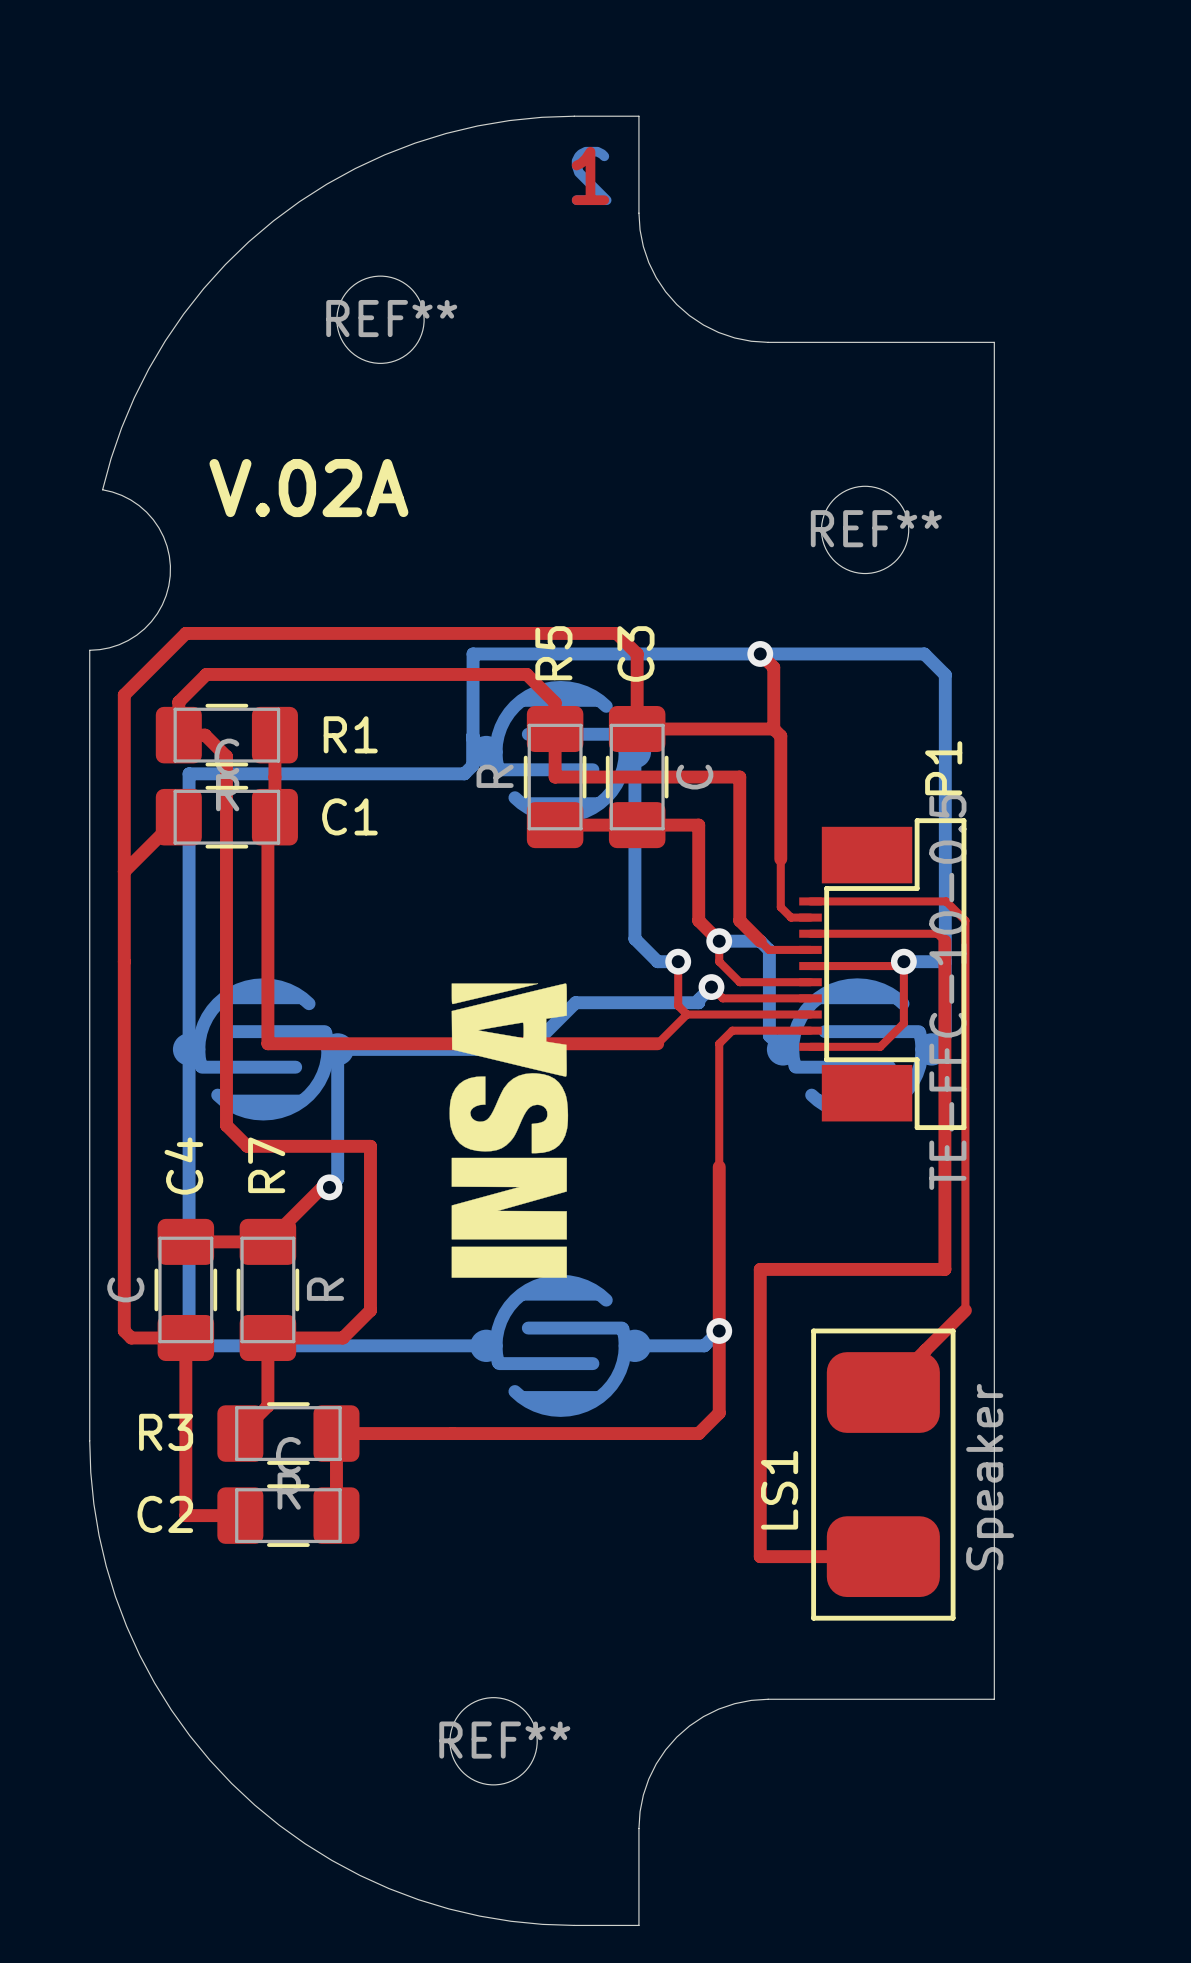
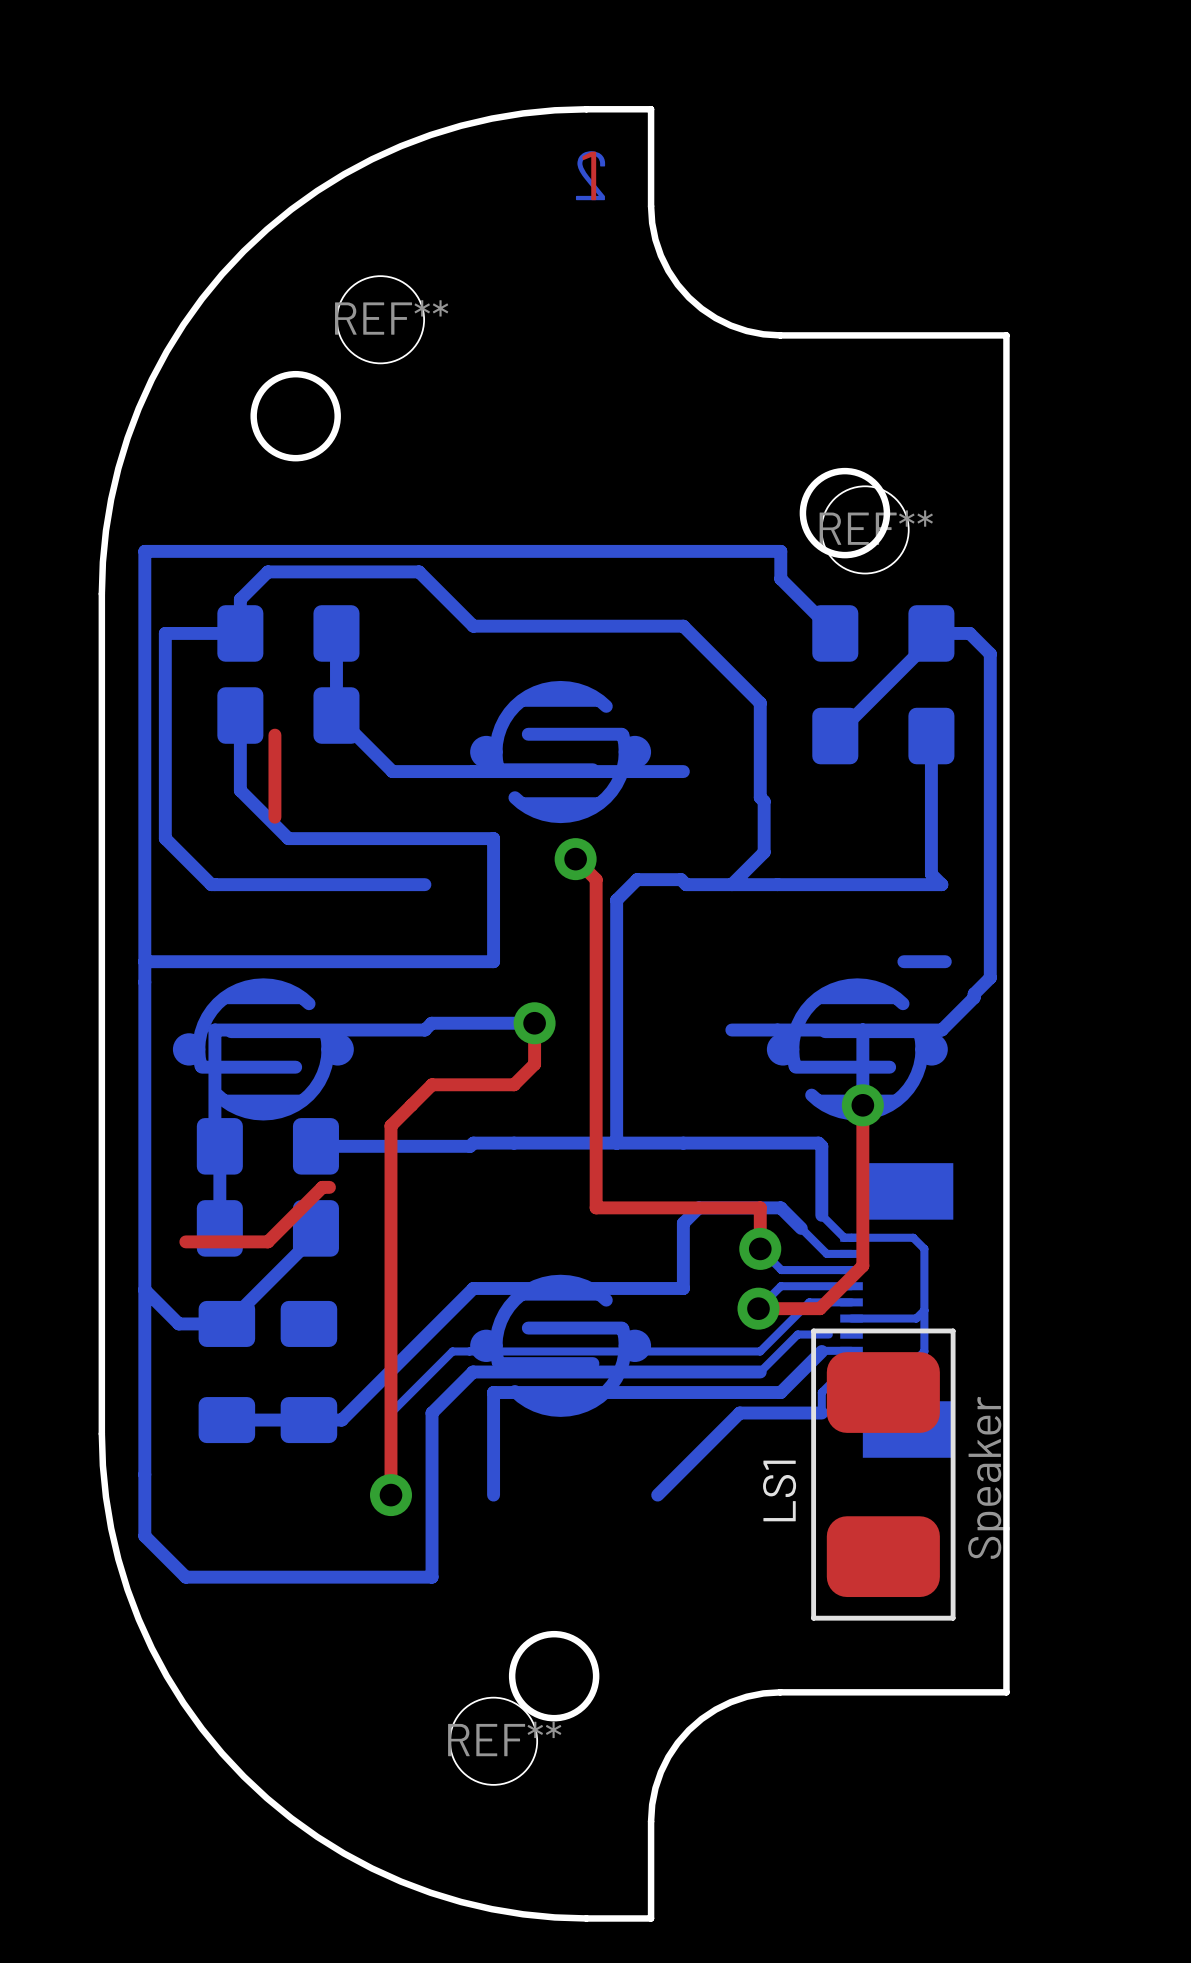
board edge: (574, 116) (638, 116) (638, 213) (643, 246) (656, 277) (665, 291) (689, 315) (703, 325) (734, 337) (768, 342) (994, 342) (994, 1699) (768, 1699) (734, 1703) (703, 1716) (689, 1725) (665, 1749) (656, 1763) (643, 1795) (638, 1828) (638, 1925) (574, 1925) (511, 1921) (479, 1916) (418, 1899) (360, 1875) (332, 1860) (305, 1843) (254, 1805) (231, 1783) (189, 1735) (171, 1710) (139, 1655) (115, 1596) (106, 1566) (99, 1535) (90, 1472) (89, 650) (119, 644) (144, 628) (162, 604) (170, 575) (167, 546) (153, 519) (130, 499) (102, 489) (121, 427) (134, 397) (165, 340) (203, 288) (248, 241) (299, 201) (355, 168) (415, 143) (477, 125) (509, 120) (574, 116) -> (586, 109) (554, 110) (491, 118) (430, 134) (372, 159) (317, 190) (266, 229) (243, 251) (201, 298) (183, 324) (151, 379) (127, 438) (111, 499) (102, 562) (101, 593) (102, 1465) (111, 1528) (118, 1559) (127, 1589) (151, 1648) (183, 1703) (201, 1728) (243, 1776) (266, 1798) (317, 1836) (344, 1853) (372, 1868) (430, 1892) (491, 1909) (523, 1914) (586, 1918) (651, 1918) (651, 1821) (655, 1788) (668, 1756) (677, 1742) (701, 1719) (715, 1709) (746, 1696) (780, 1692) (1006, 1692) (1006, 335) (780, 335) (746, 331) (715, 318) (701, 308) (677, 284) (668, 270) (655, 239) (651, 206) (651, 109) (586, 109)
round board edge: none -> [250, 370, 341, 462]
round board edge: none -> [799, 467, 891, 559]
text: V.02A (308, 488) -> none
bottom track: none -> (336, 633) (336, 715) (392, 771) (683, 771)
bottom track: none -> (835, 633) (780, 578) (780, 551) (144, 551) (144, 1536) (185, 1577) (432, 1577) (432, 1413) (473, 1372) (760, 1372) (797, 1334) (828, 1334)
part: none -> (883, 633)
top track: (760, 653) (773, 667) (773, 729) -> none
via: (760, 653) -> none
bottom track: none -> (240, 715) (240, 790) (288, 838) (493, 838) (493, 961) (144, 961)
top track: (773, 729) (637, 729) (637, 653) (616, 633) (185, 633) (124, 695) (124, 1330) (131, 1338) (185, 1338) (185, 1515) (240, 1515) -> none
top track: (773, 729) (780, 736) (780, 907) (791, 917) (810, 917) -> none
R1 side: top (226, 735) -> bottom (288, 715)
bottom track: (472, 736) (472, 765) (464, 773) (189, 773) (189, 1334) (200, 1345) (486, 1345) -> none
bottom track: (473, 736) (473, 653) (924, 653) (945, 674) (945, 1035) (931, 1049) -> none
bottom track: none -> (835, 736) (931, 639) (931, 633) (969, 633) (990, 653) (990, 977) (974, 994) (974, 997) (941, 1030) (731, 1030)
part: none -> (883, 736)
bottom track: none -> (931, 736) (931, 874) (941, 884) (686, 884) (681, 879) (637, 879) (616, 900) (616, 1143)
bottom track: (634, 752) (634, 938) (657, 961) (678, 961) -> none
R5 side: top (555, 777) -> bottom (267, 1228)
C3 side: top (637, 777) -> bottom (267, 1146)
top track: (178, 817) (124, 871) -> none
C1 side: top (226, 817) -> bottom (288, 633)
top track: (555, 825) (698, 825) (698, 920) (719, 941) (719, 961) (739, 982) (810, 982) -> none
top track: (267, 838) (267, 1043) (657, 1043) (686, 1014) -> none
top track: none -> (575, 859) (596, 879) (596, 1207) (760, 1207) (760, 1248)
via: none -> (575, 859)
bottom track: none -> (424, 884) (211, 884) (165, 838) (165, 633) (240, 633) (240, 599) (267, 571) (419, 571) (473, 626) (683, 626) (760, 703) (760, 797) (764, 801) (764, 852) (731, 884)
top track: (810, 901) (946, 901) (965, 920) (965, 1310) (883, 1392) -> none
top track: (810, 933) (937, 933) (944, 941) (944, 1269) (760, 1269) (760, 1556) (883, 1556) -> none
bottom track: (719, 941) (760, 941) (769, 950) (769, 1035) (783, 1049) -> none
via: (719, 941) -> none
top track: (810, 949) (768, 949) (739, 920) (739, 777) (555, 777) (555, 702) (526, 674) (206, 674) (178, 702) (178, 735) (205, 735) (226, 756) (226, 1125) (247, 1146) (370, 1146) (370, 1310) (342, 1338) (267, 1338) (267, 1406) (240, 1433) -> none
top track: (678, 961) (678, 1005) (686, 1014) -> none
via: (678, 961) -> none
via: (903, 961) -> none
top track: (810, 966) (899, 966) (903, 961) (903, 1023) (880, 1046) (810, 1046) -> none
P1 side: top (882, 974) -> bottom (896, 1310)
drawing: [449, 983, 569, 1278] -> none
top track: (711, 987) (722, 998) (810, 998) -> none
bottom track: (711, 987) (698, 999) (698, 1002) (575, 1002) (528, 1049) (337, 1049) (337, 1179) (329, 1187) -> none
via: (711, 987) -> none
top track: (686, 1014) (810, 1014) -> none
top track: none -> (534, 1023) (534, 1064) (514, 1084) (432, 1084) (390, 1125) (390, 1495)
bottom track: none -> (534, 1023) (431, 1023) (424, 1030) (214, 1030) (214, 1141) (219, 1146) (219, 1228)
via: none -> (534, 1023)
top track: (810, 1030) (732, 1030) (719, 1043) (719, 1413) (698, 1433) (336, 1433) (336, 1515) -> none
bottom track: none -> (862, 1030) (862, 1105)
top track: none -> (862, 1105) (862, 1265) (820, 1308) (758, 1308)
via: none -> (862, 1105)
bottom track: none -> (315, 1146) (470, 1146) (473, 1143) (818, 1143) (821, 1146) (821, 1215) (844, 1237) (913, 1237) (924, 1248) (924, 1351) (908, 1366) (851, 1366)
via: (329, 1187) -> none
bottom track: none -> (315, 1228) (315, 1234) (226, 1323) (178, 1323) (144, 1289)
bottom track: none -> (760, 1248) (781, 1270) (851, 1270)
via: none -> (760, 1248)
bottom track: none -> (851, 1253) (826, 1253) (780, 1207) (698, 1207) (683, 1223) (683, 1288) (473, 1288) (341, 1420) (226, 1420)
bottom track: none -> (851, 1286) (780, 1286) (758, 1308)
C4: C (185, 1289) -> none
R7: R (267, 1289) -> none
bottom track: none -> (851, 1302) (809, 1302) (760, 1351) (452, 1351) (390, 1413) (390, 1495)
via: none -> (758, 1308)
bottom track: none -> (924, 1310) (916, 1318) (851, 1318)
bottom track: (719, 1330) (704, 1345) (634, 1345) -> none
via: (719, 1330) -> none
bottom track: none -> (851, 1350) (822, 1350) (780, 1392) (493, 1392) (493, 1495)
bottom track: none -> (851, 1383) (831, 1383) (821, 1392) (821, 1413) (739, 1413) (657, 1495)
R3 side: top (288, 1433) -> bottom (226, 1372)
via: none -> (390, 1495)
C2 side: top (288, 1515) -> bottom (308, 1372)
round board edge: none -> [508, 1630, 600, 1722]

